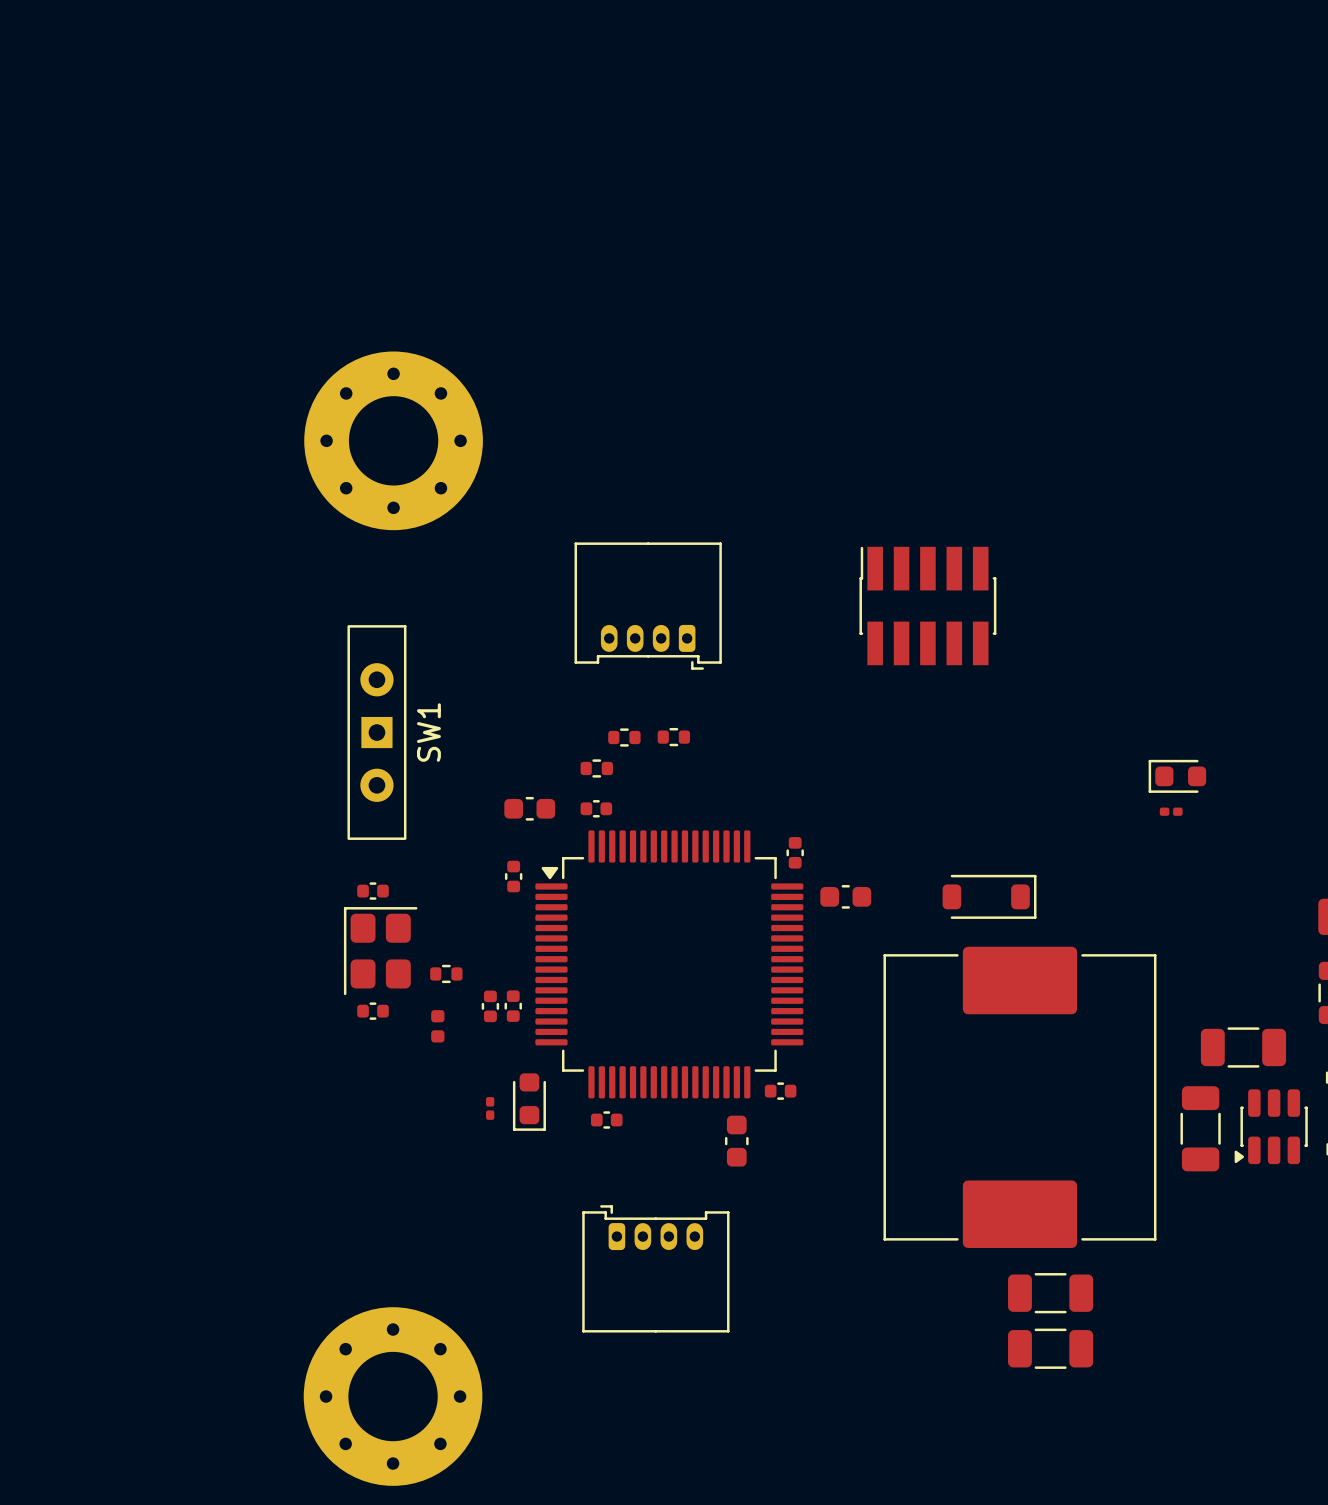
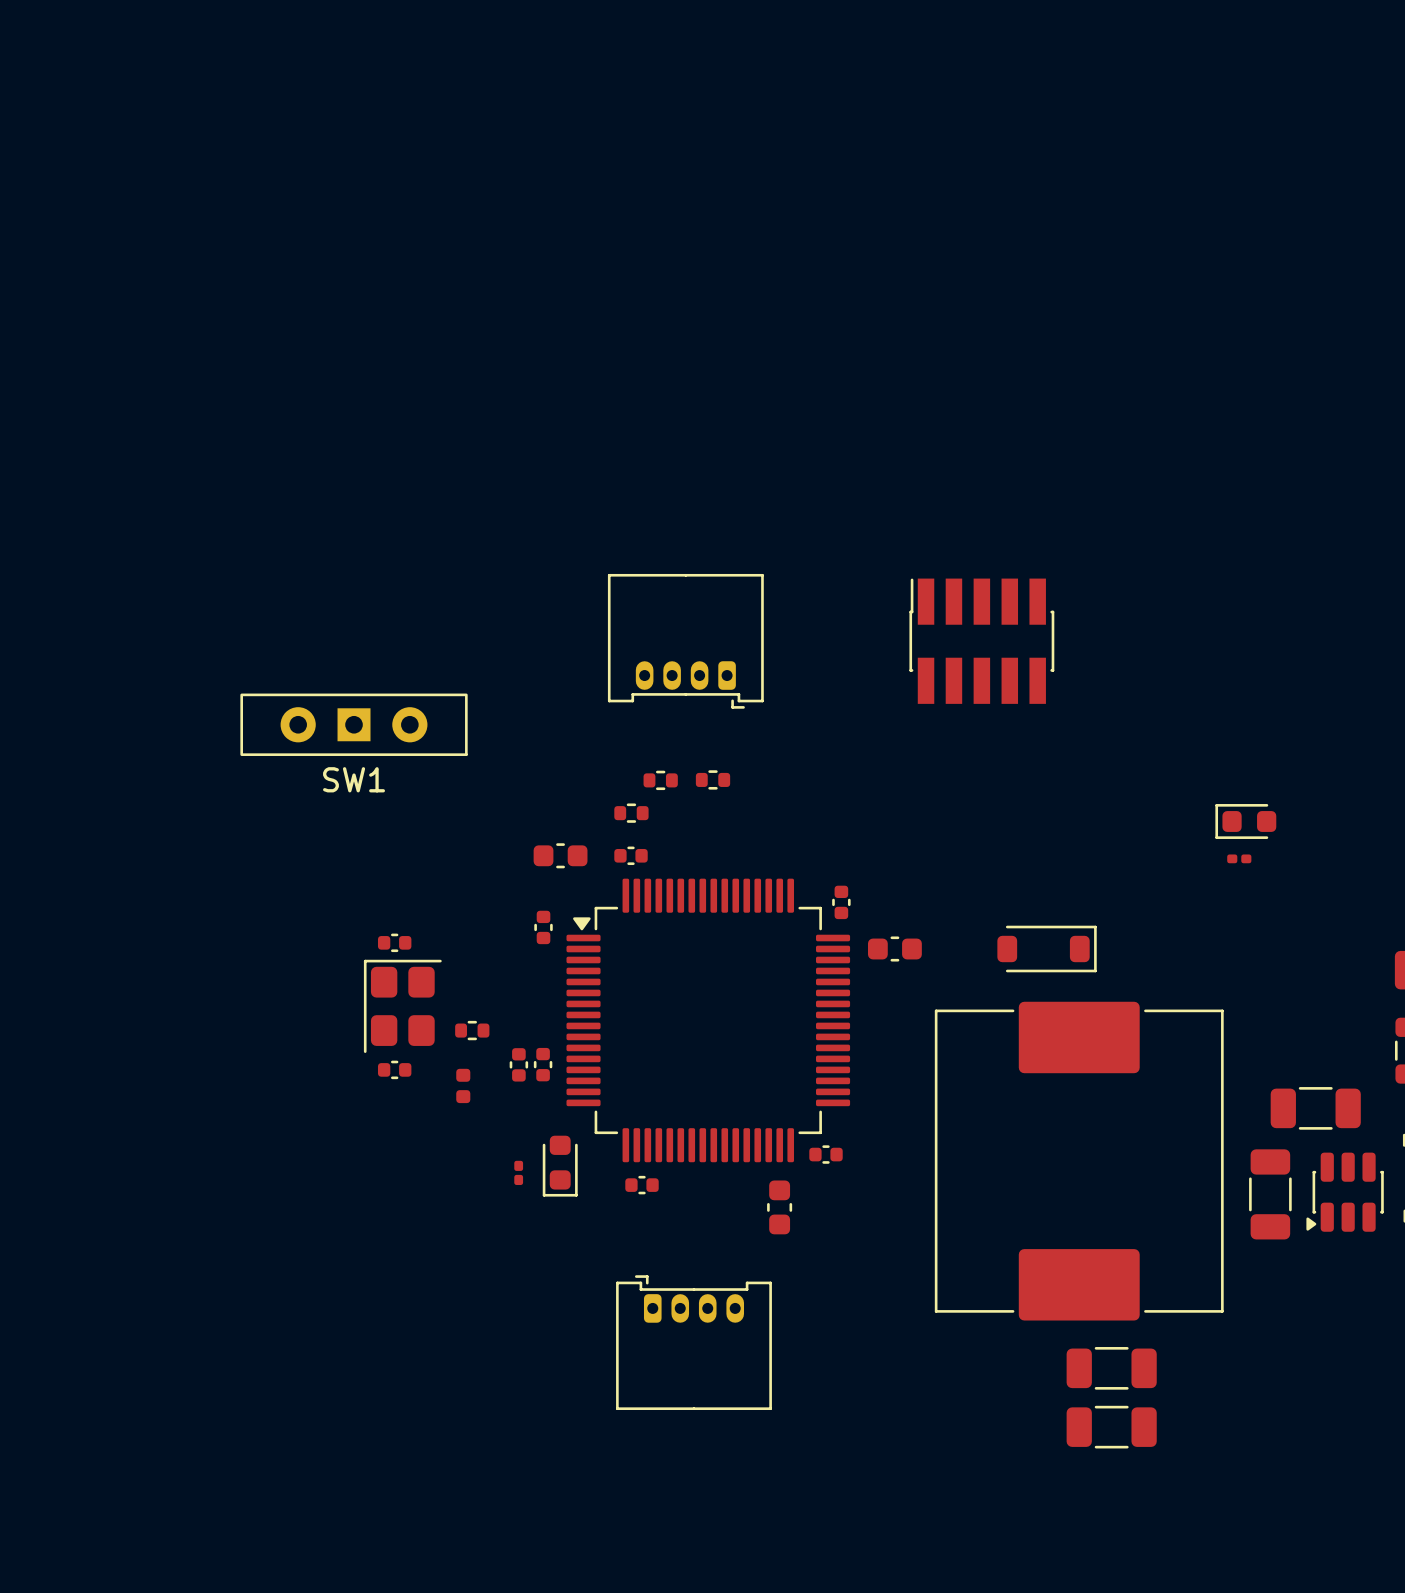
part: (393, 440) -> none
SW1 rotation: 0° (376, 732) -> 90° clockwise (354, 724)
part: (393, 1396) -> none

